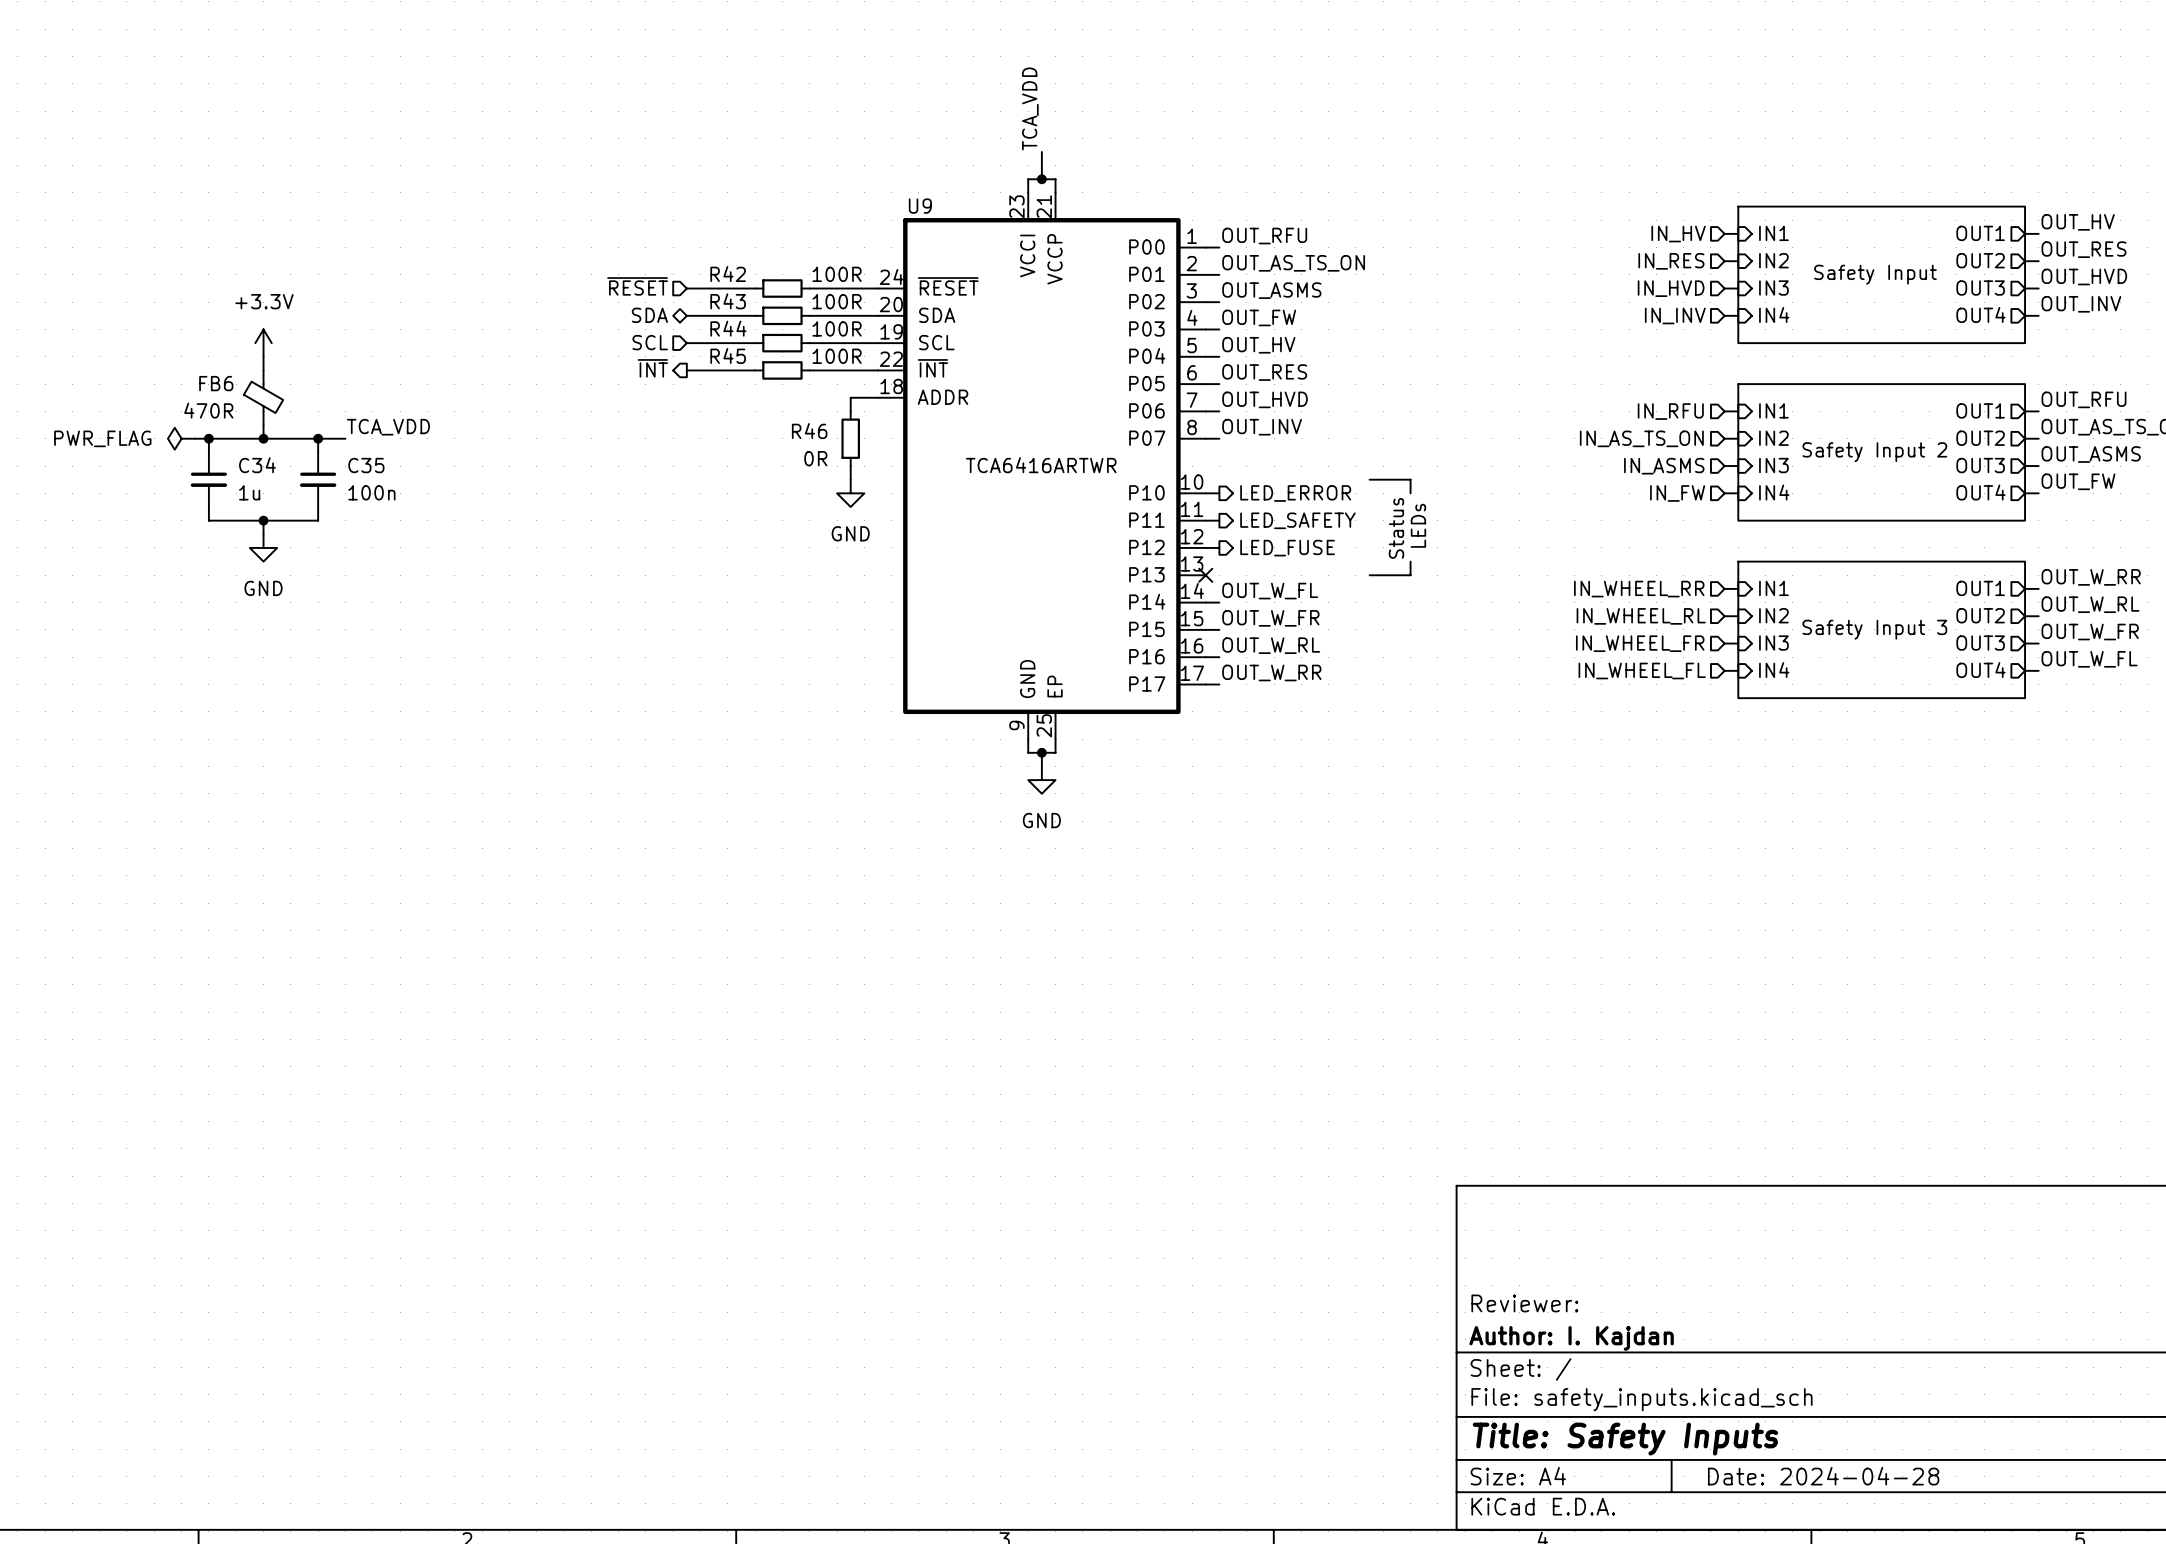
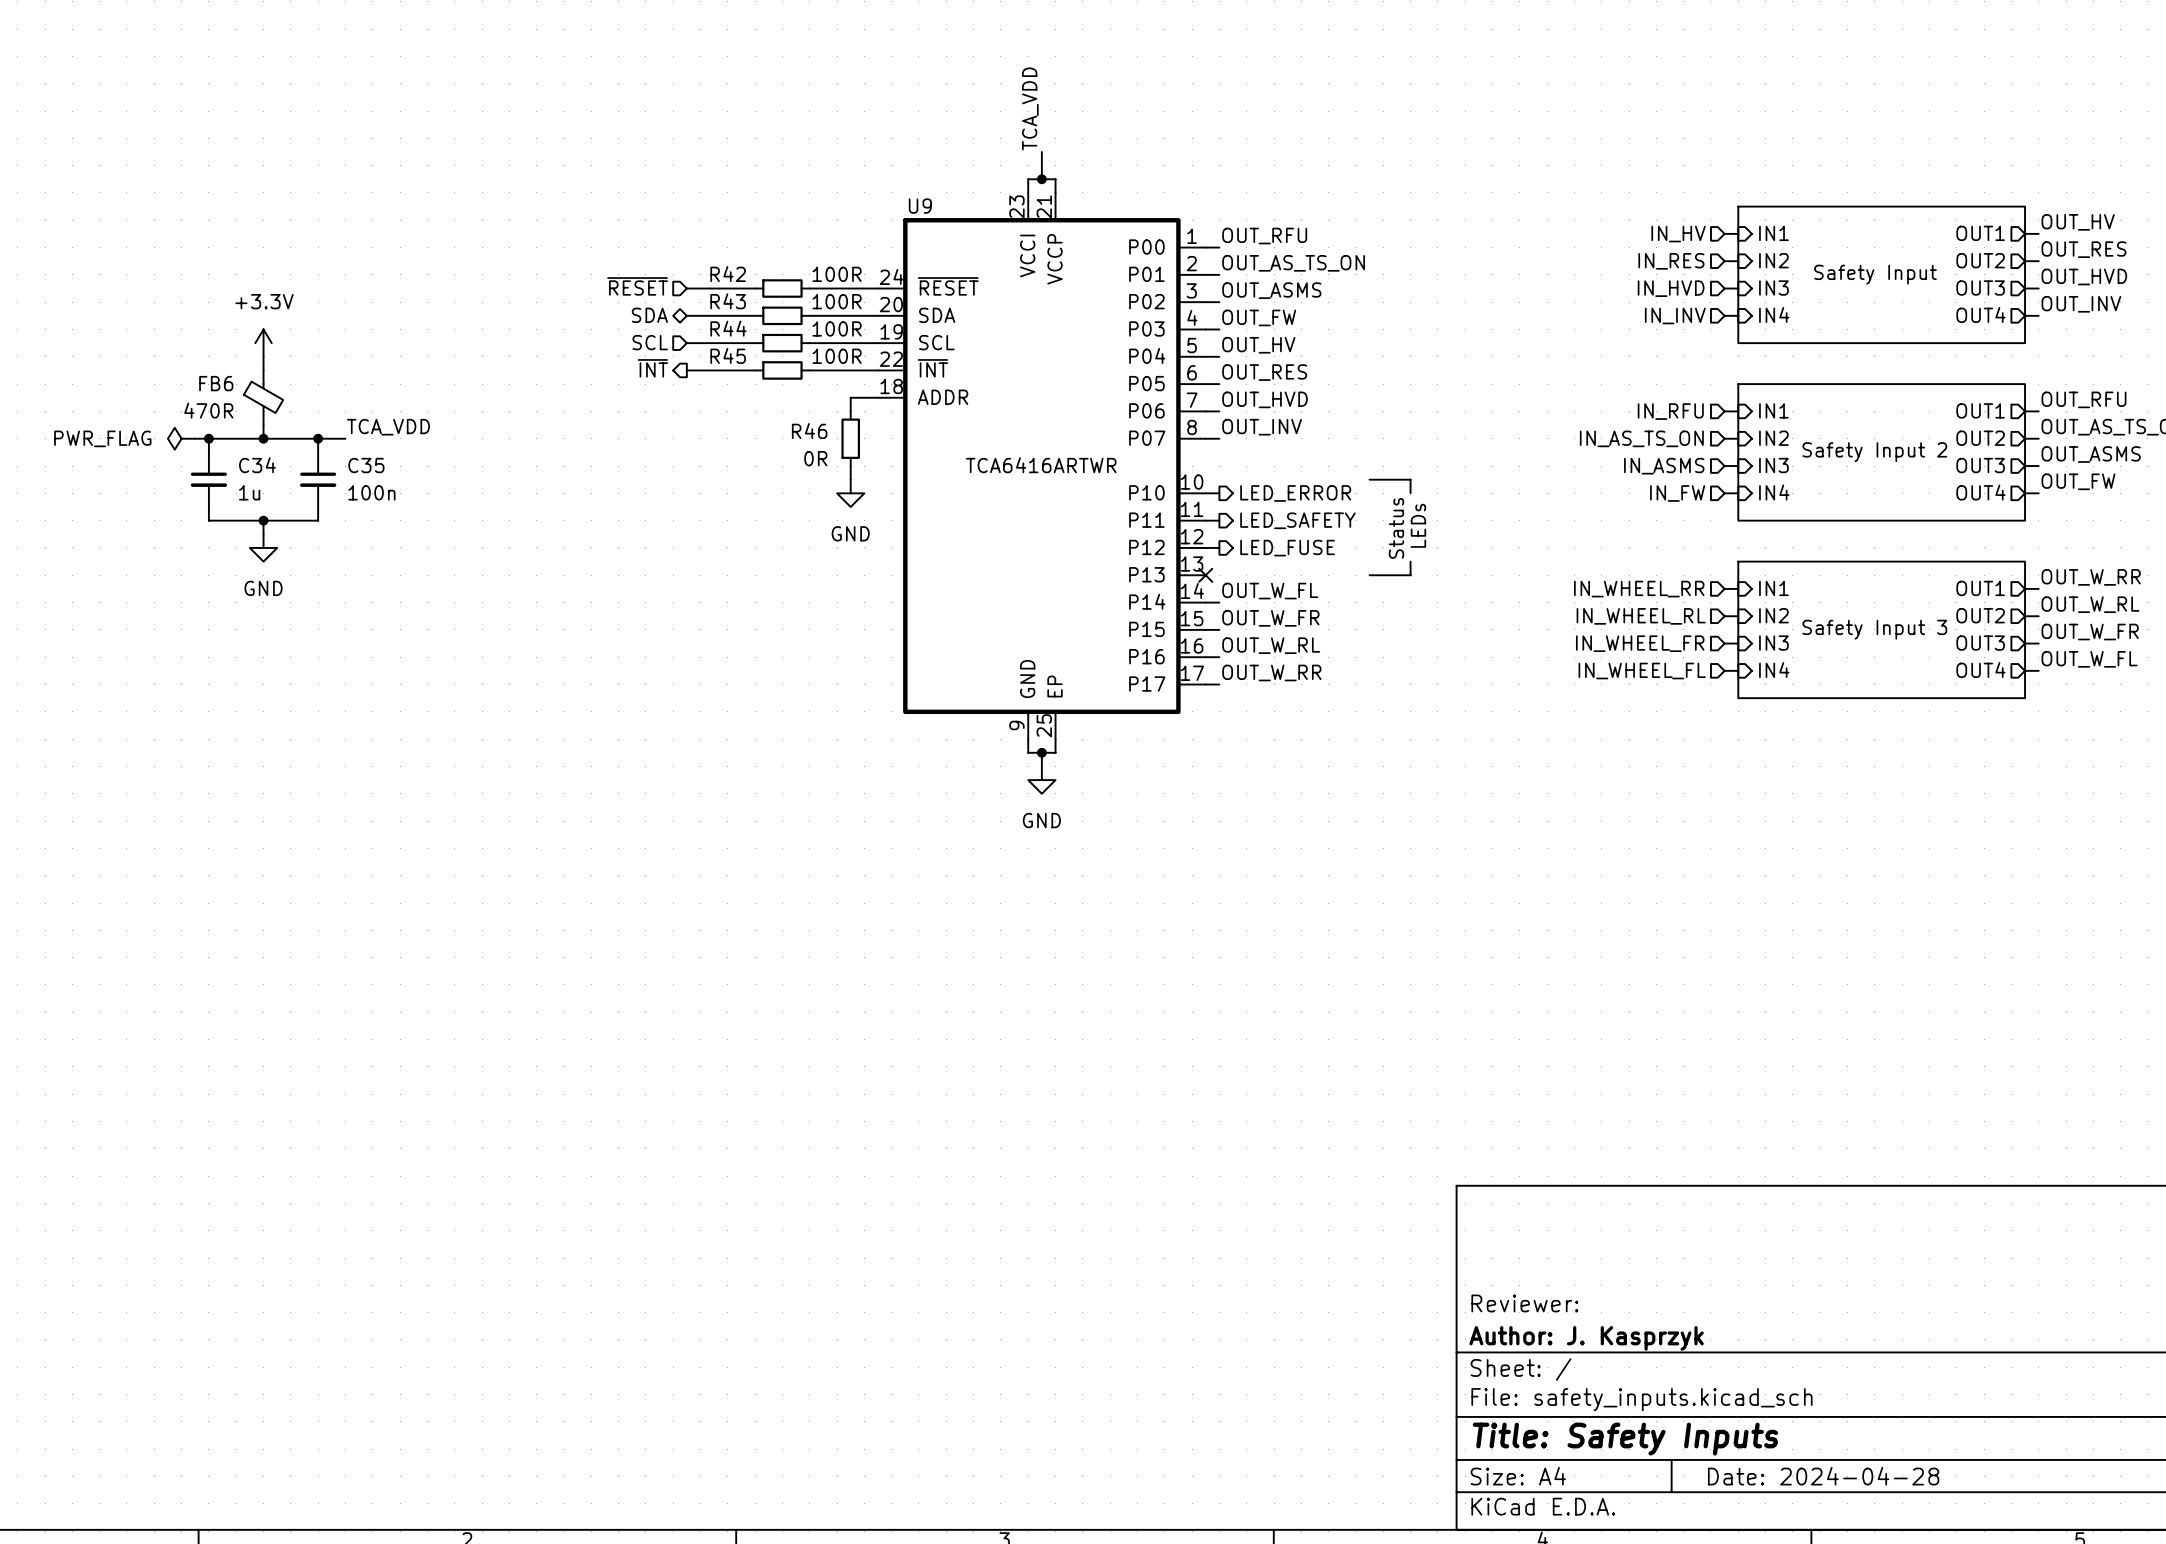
title block: Author: I. Kajdan (1571, 1338) -> Author: J. Kasprzyk (1586, 1338)

